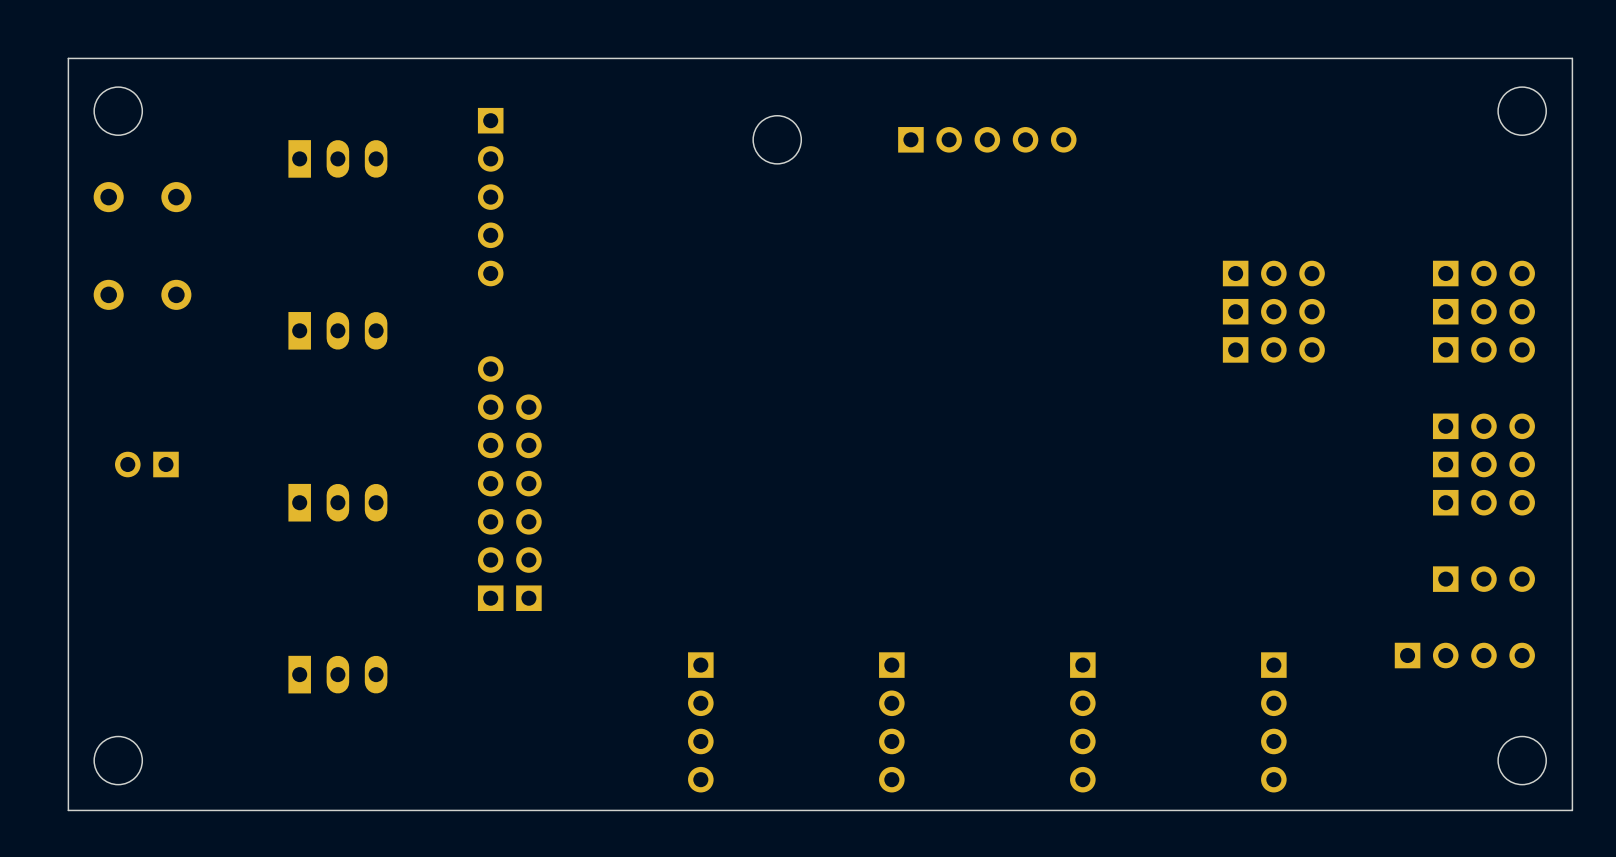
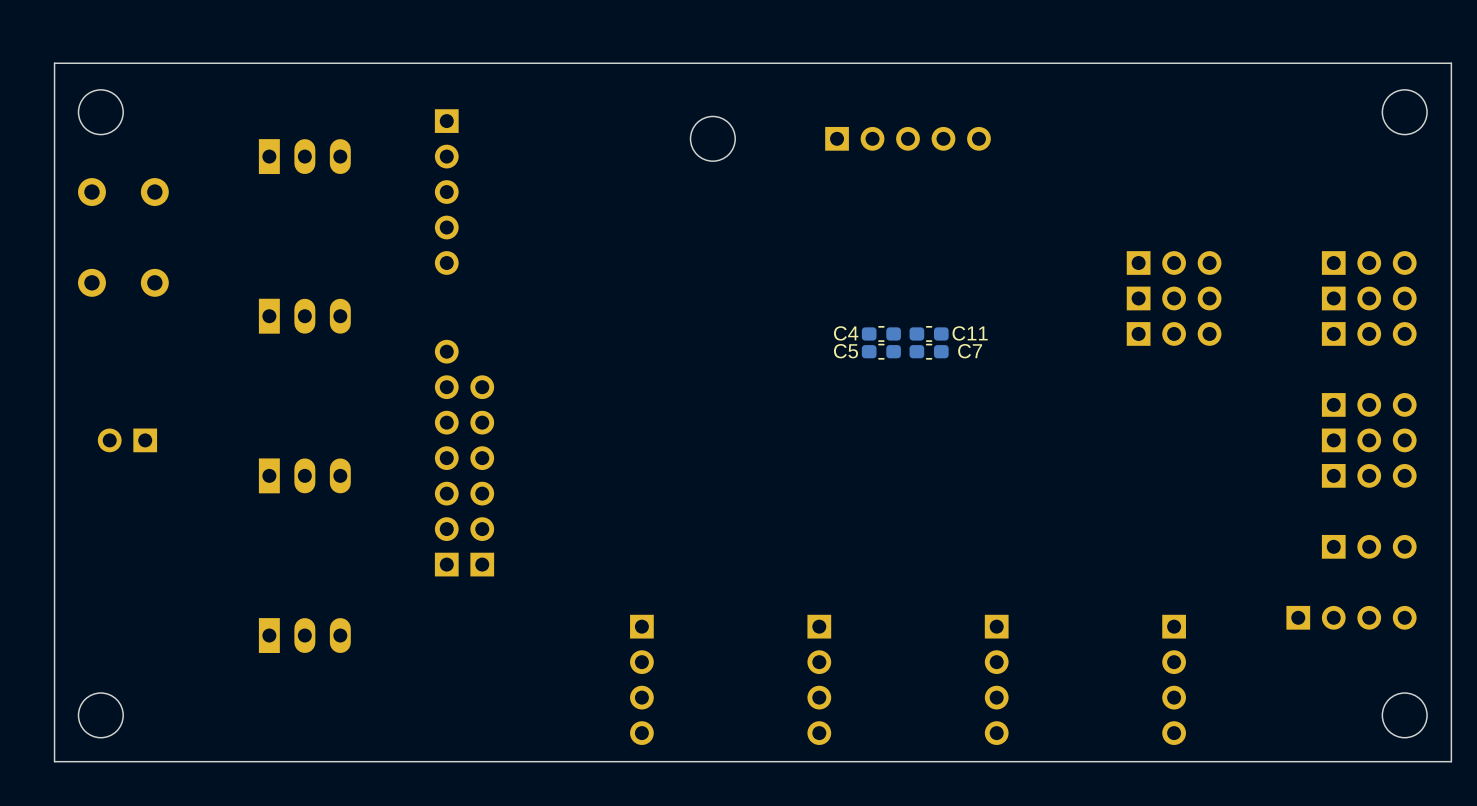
C4: none -> (881, 333)
C11: none -> (929, 333)
C5: none -> (881, 351)
C7: none -> (929, 351)

